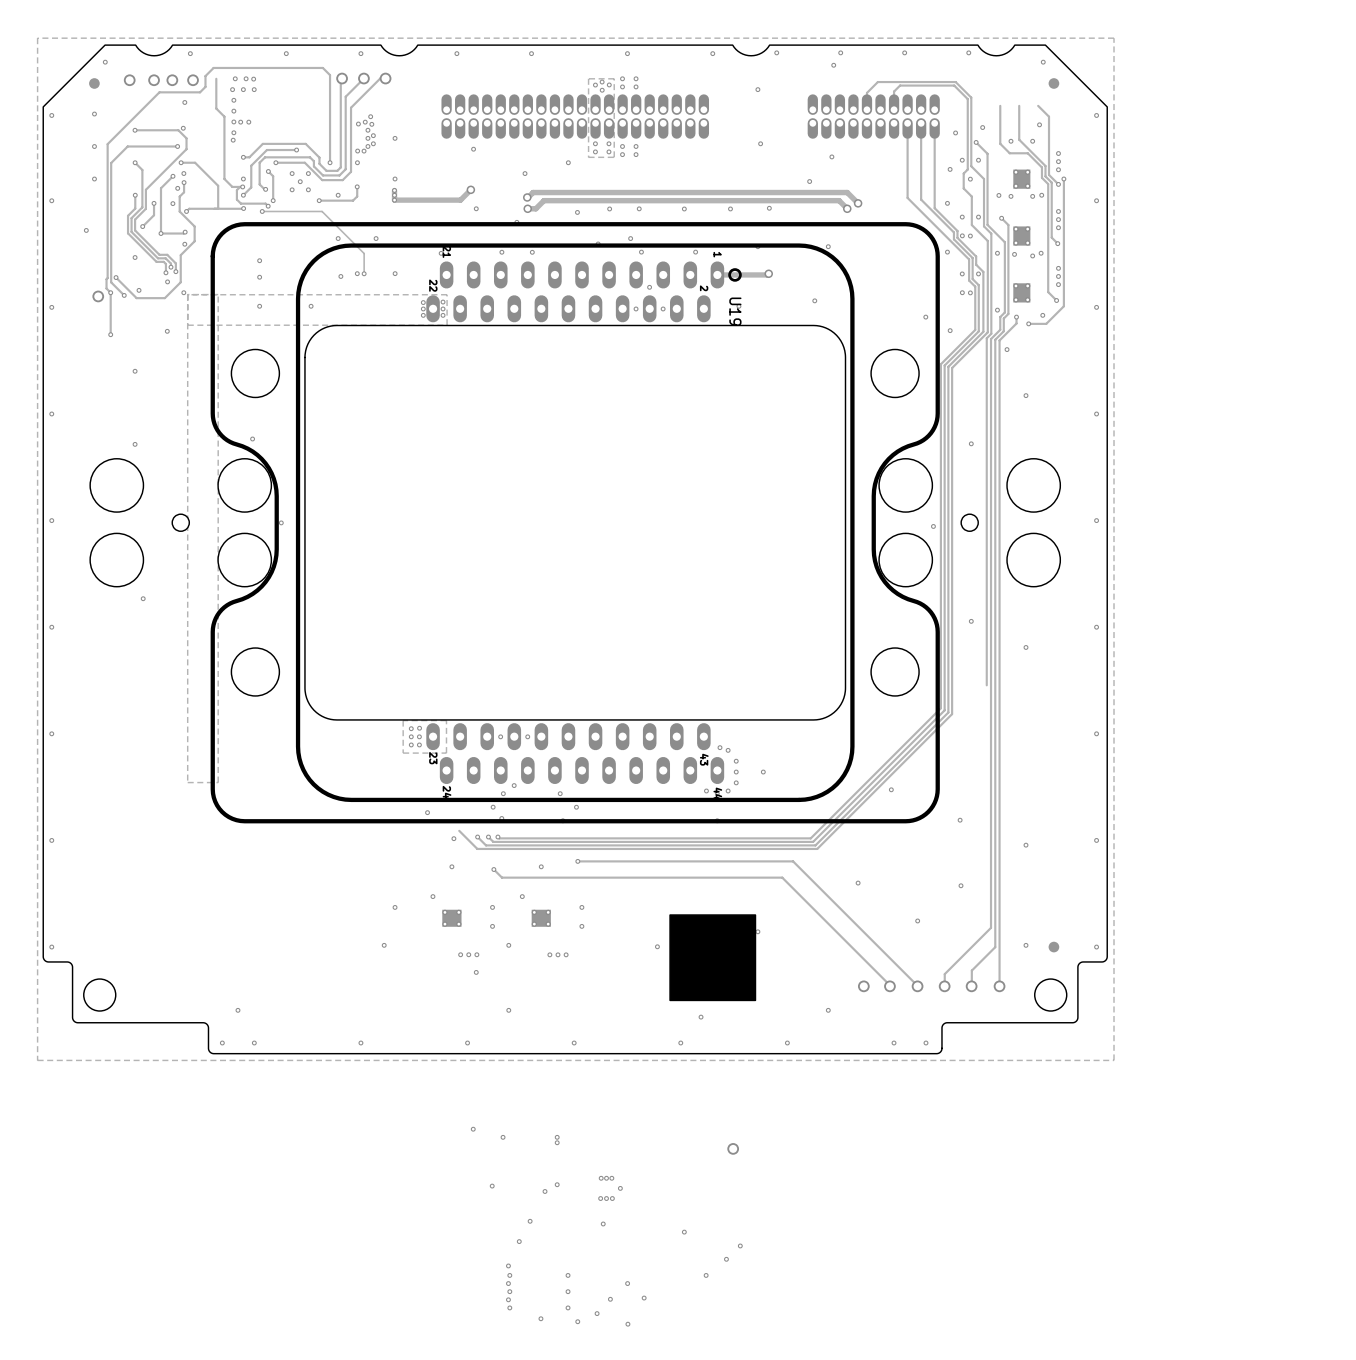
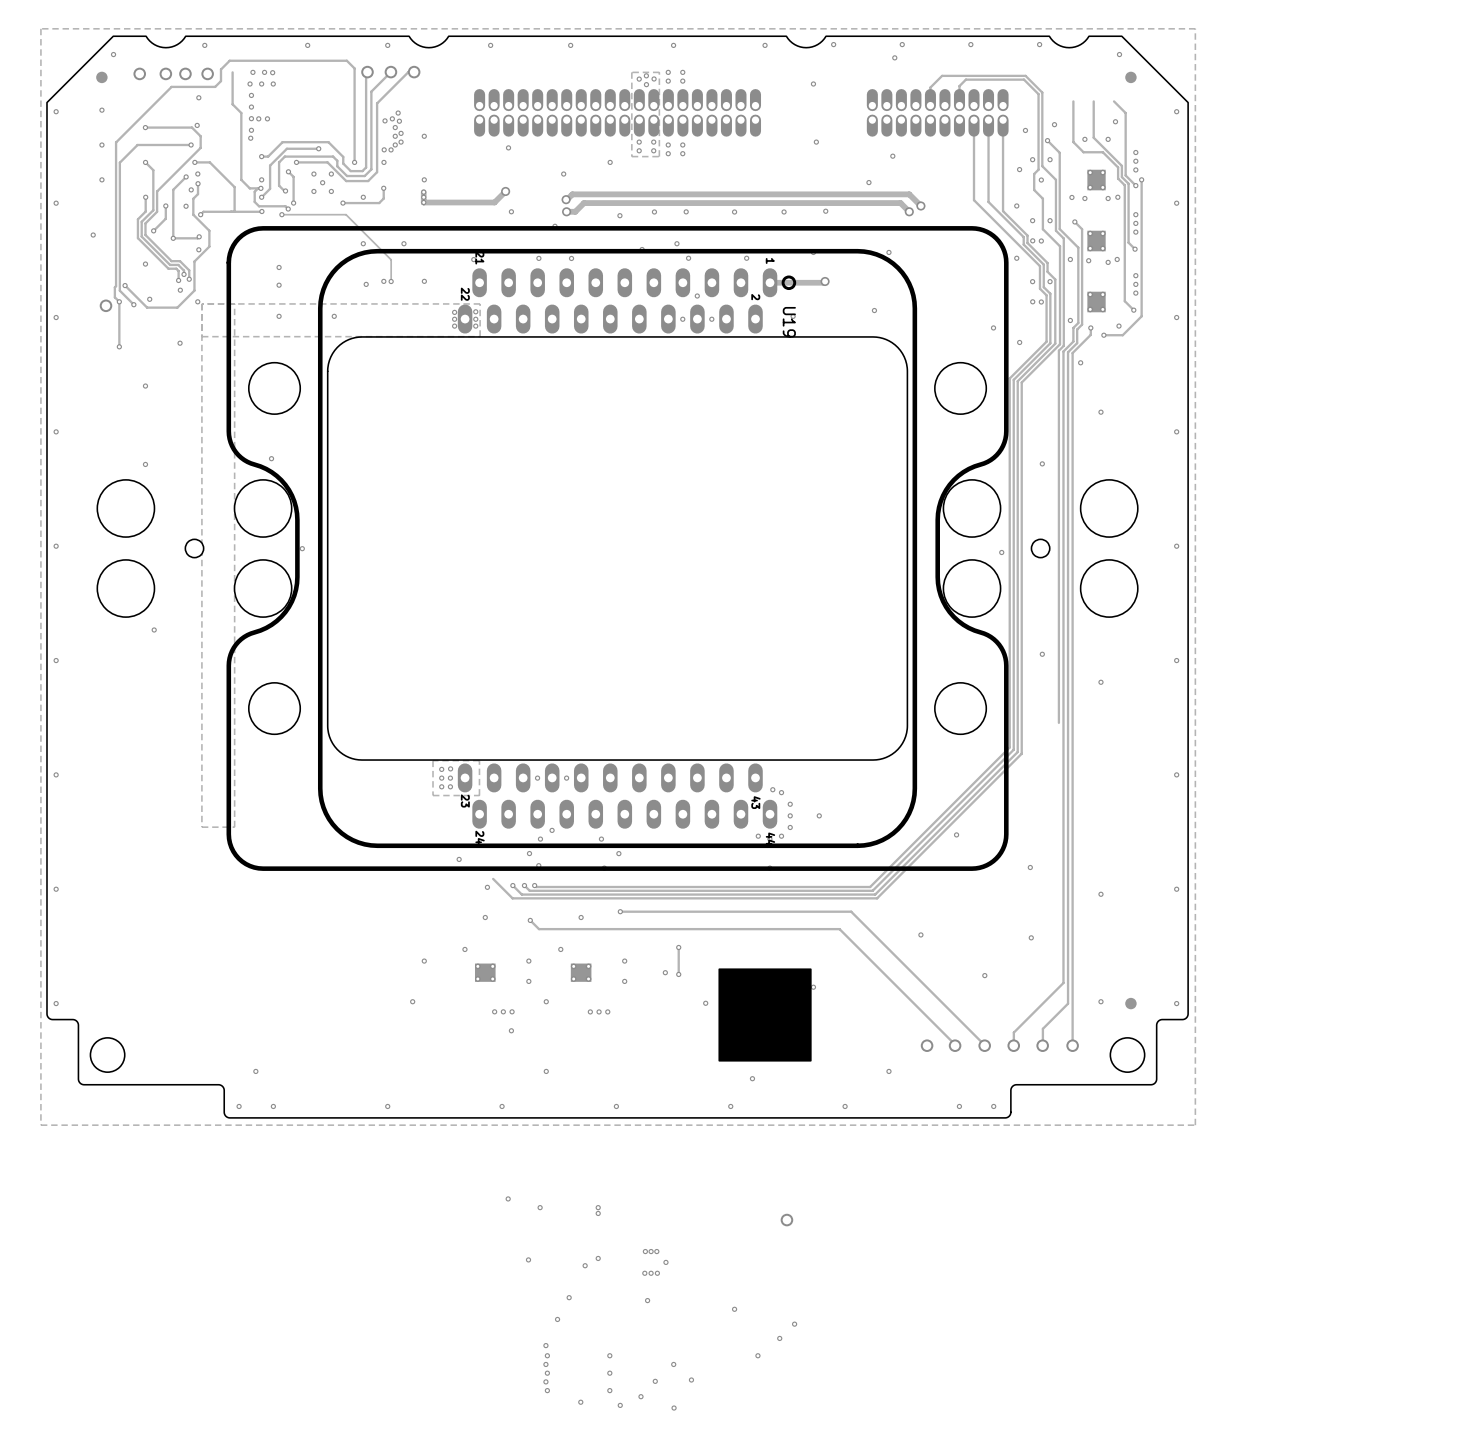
track: none -> (678, 947) (678, 974)
via: none -> (678, 947)
via: none -> (665, 972)
via: none -> (678, 974)

